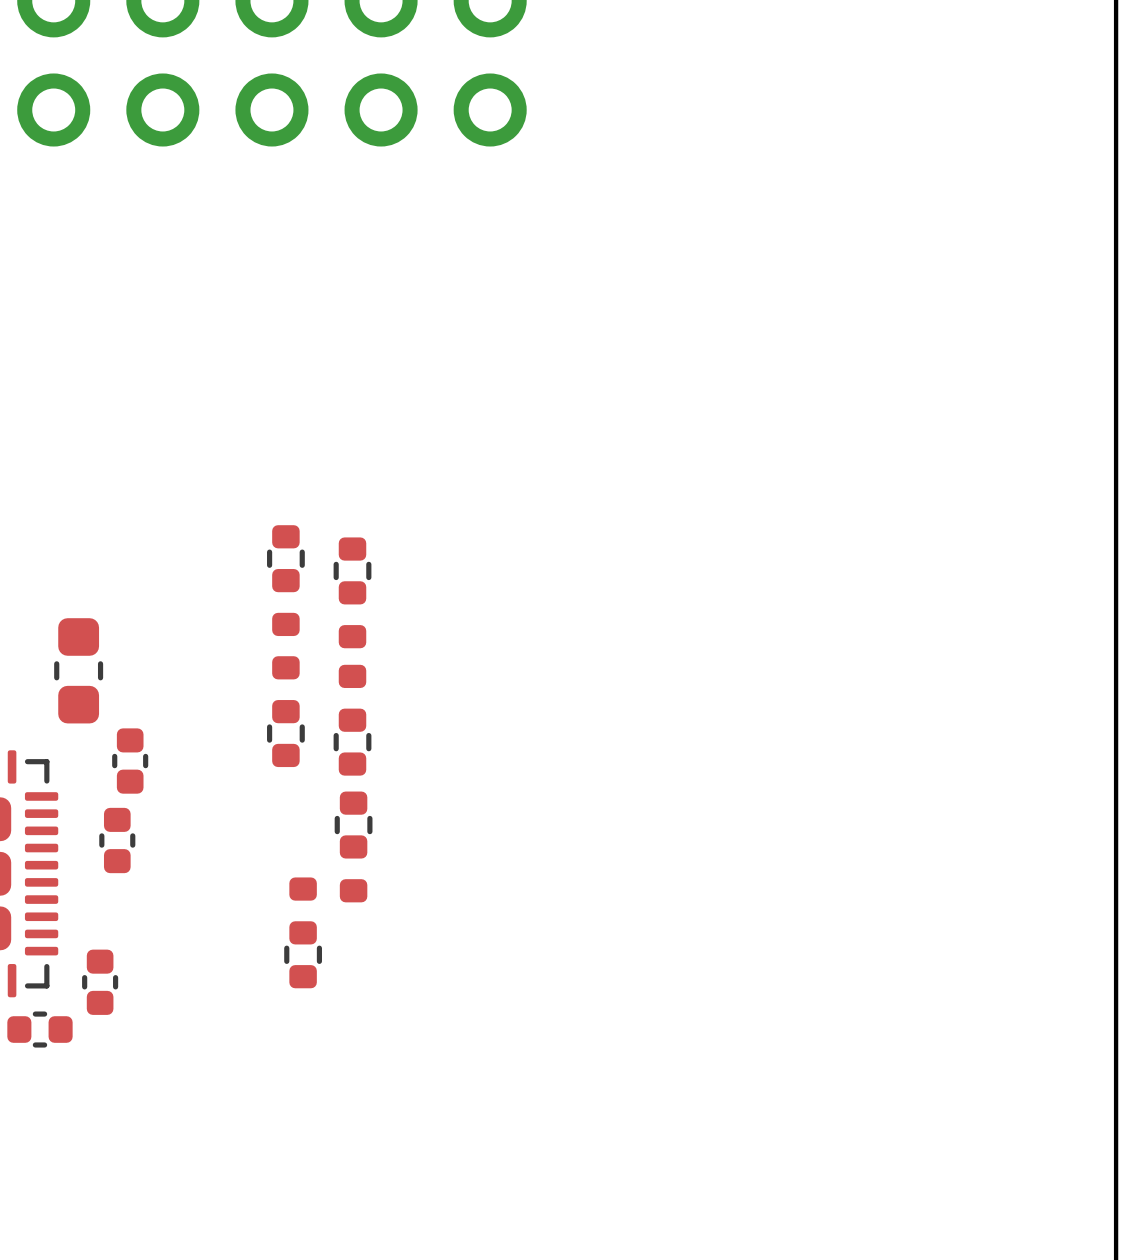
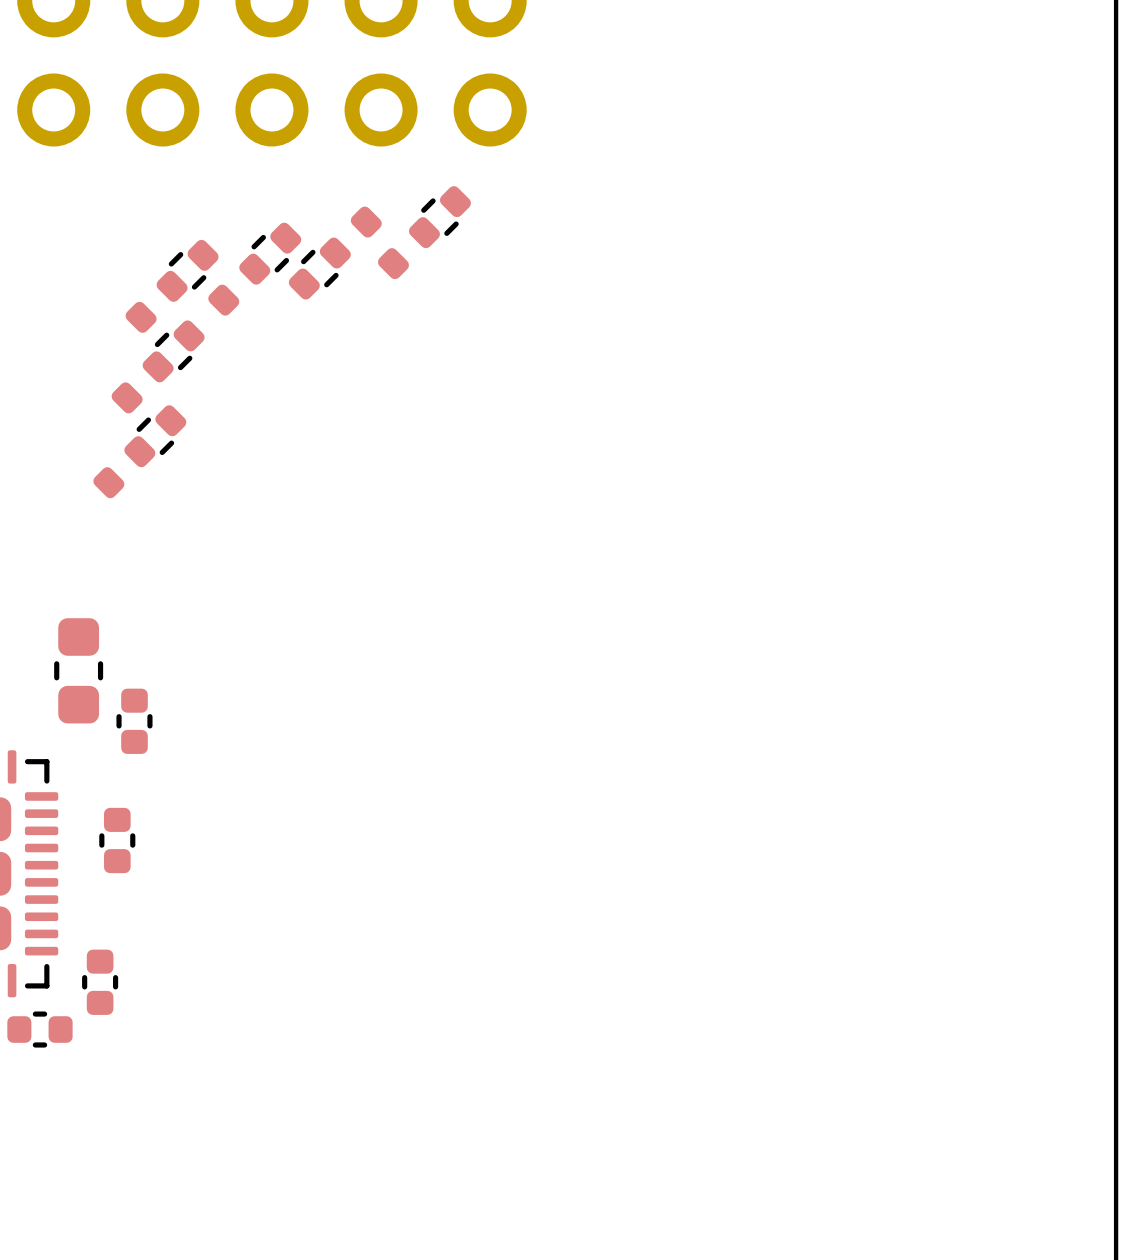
part: none -> (424, 232)
part: none -> (335, 253)
part: none -> (254, 269)
part: none -> (172, 286)
part: none -> (158, 366)
part: none -> (139, 451)
part: (285, 580) -> none
part: (352, 592) -> none
part: (285, 711) -> none
part: (352, 720) -> none
part position: (130, 761) -> (134, 721)
part: (353, 846) -> none
part: (303, 932) -> none

